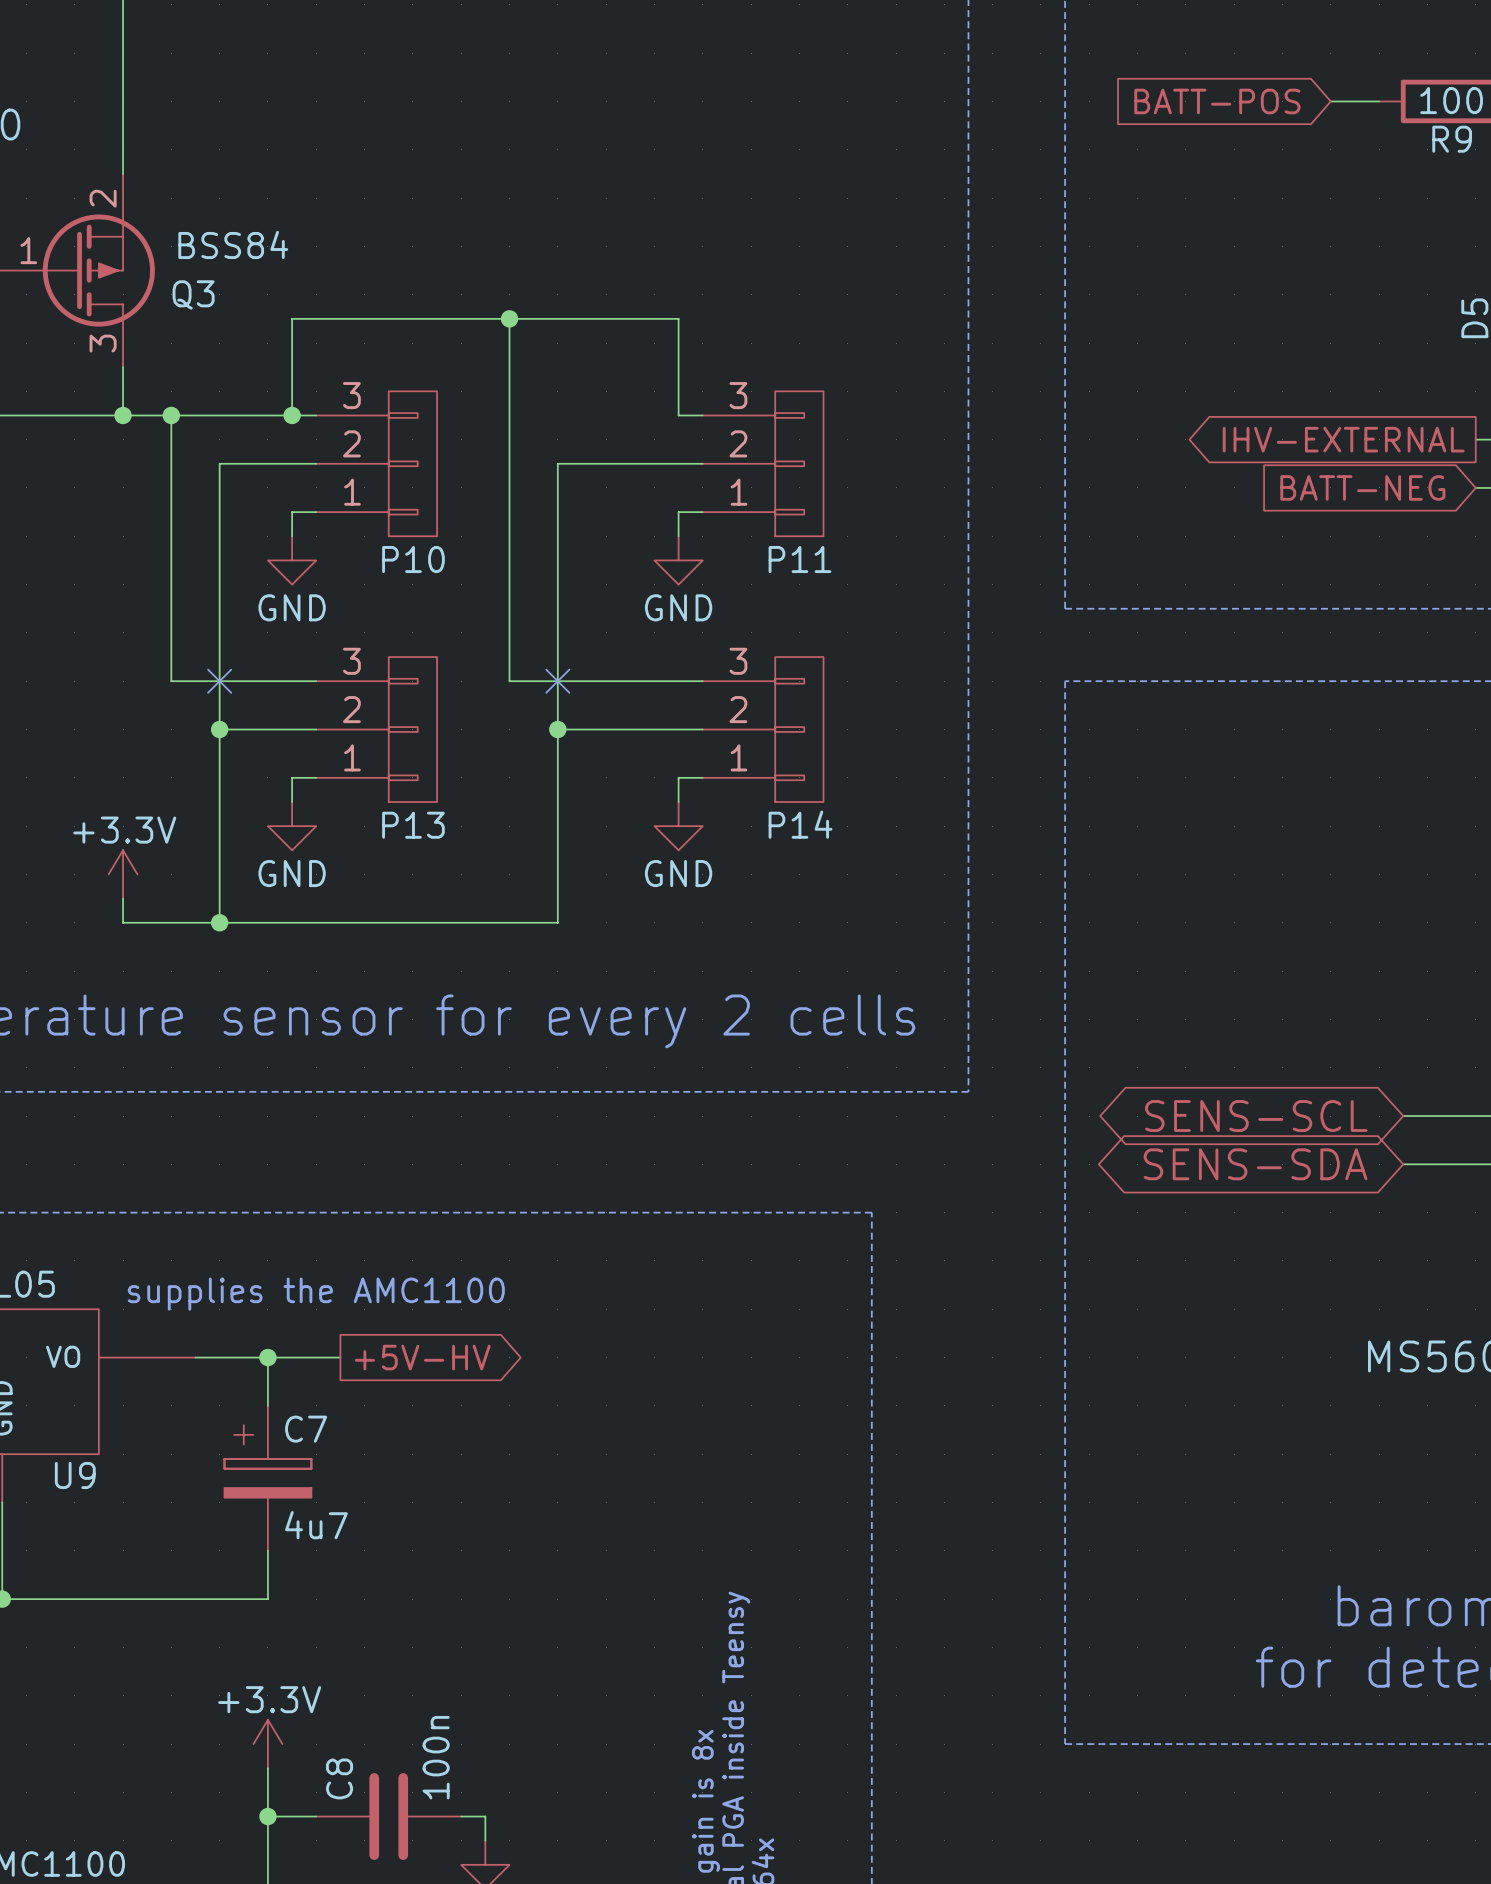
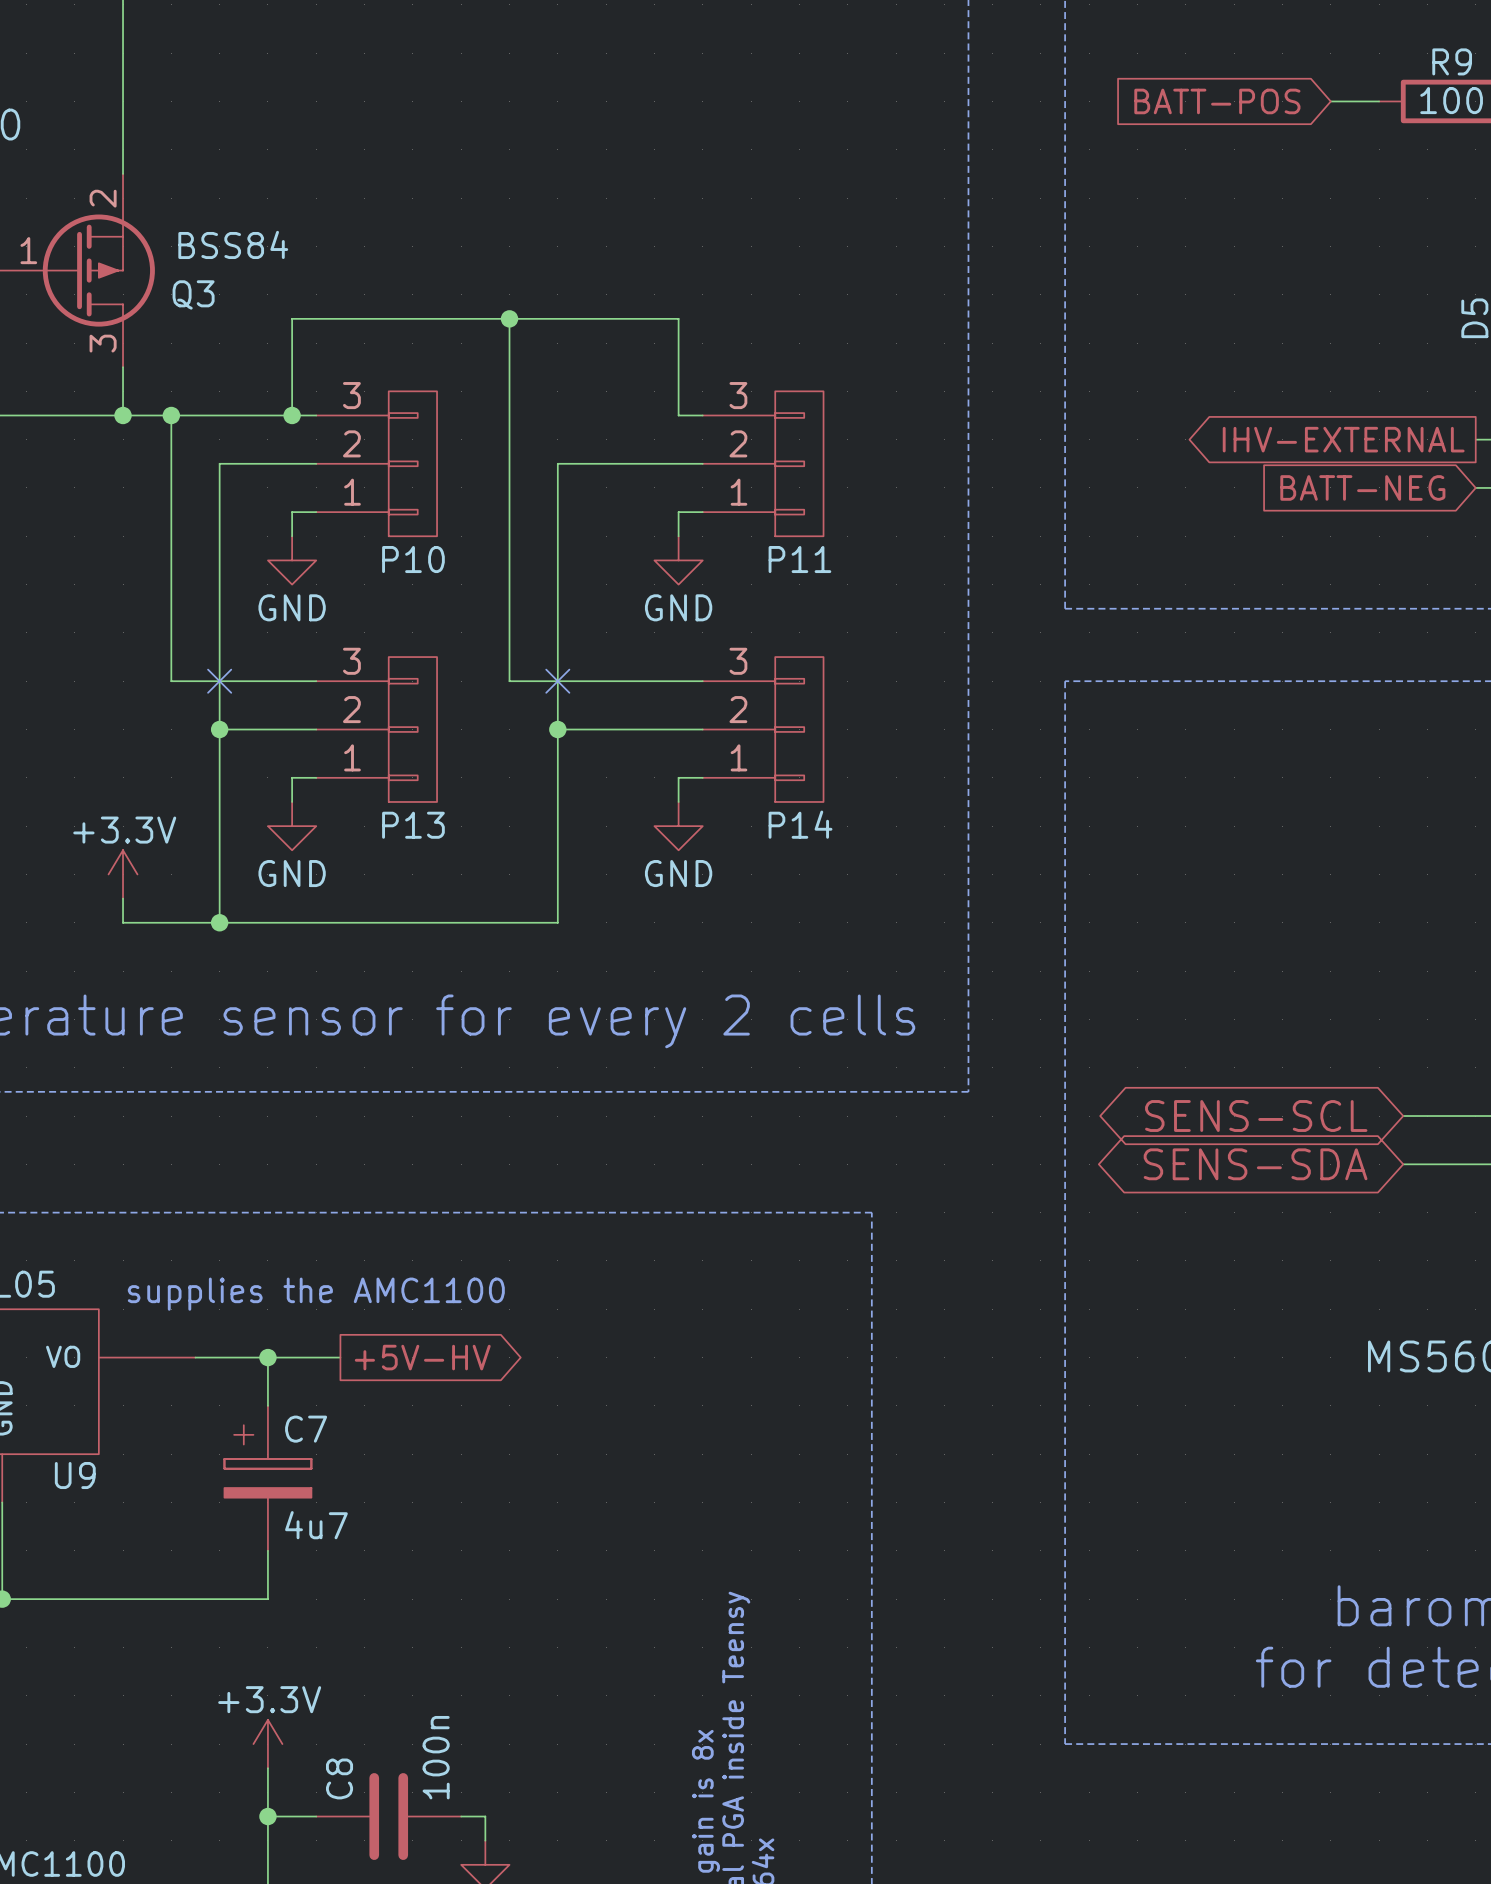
R9 name position: R9 (1452, 139) -> R9 (1452, 61)

